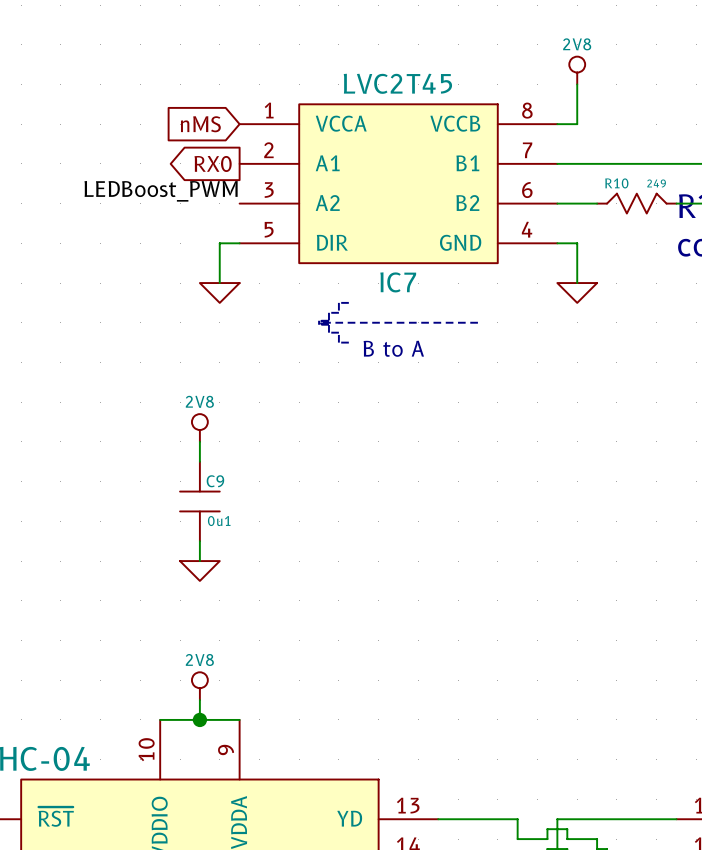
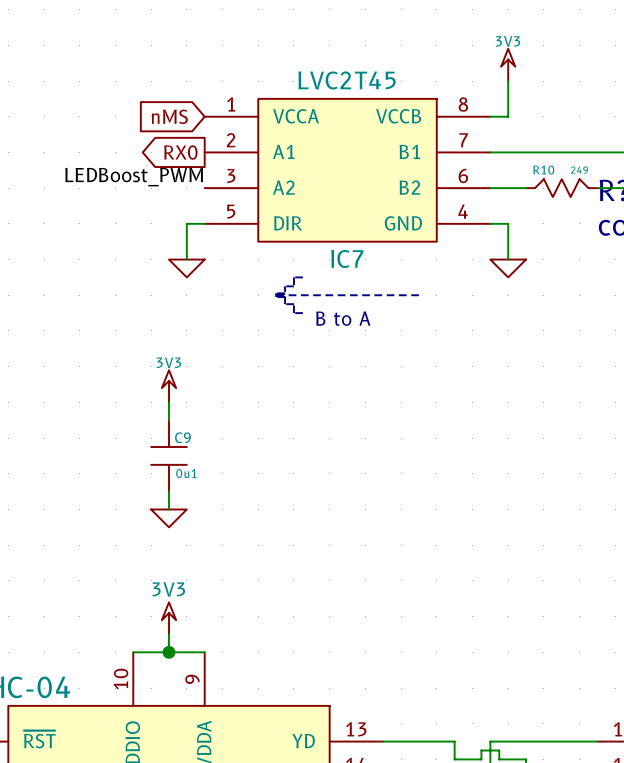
power symbol: 2V8 (577, 70) -> 3V3 (508, 64)
power symbol: 2V8 (199, 428) -> 3V3 (168, 386)
power symbol: 2V8 (199, 686) -> 3V3 (168, 618)

